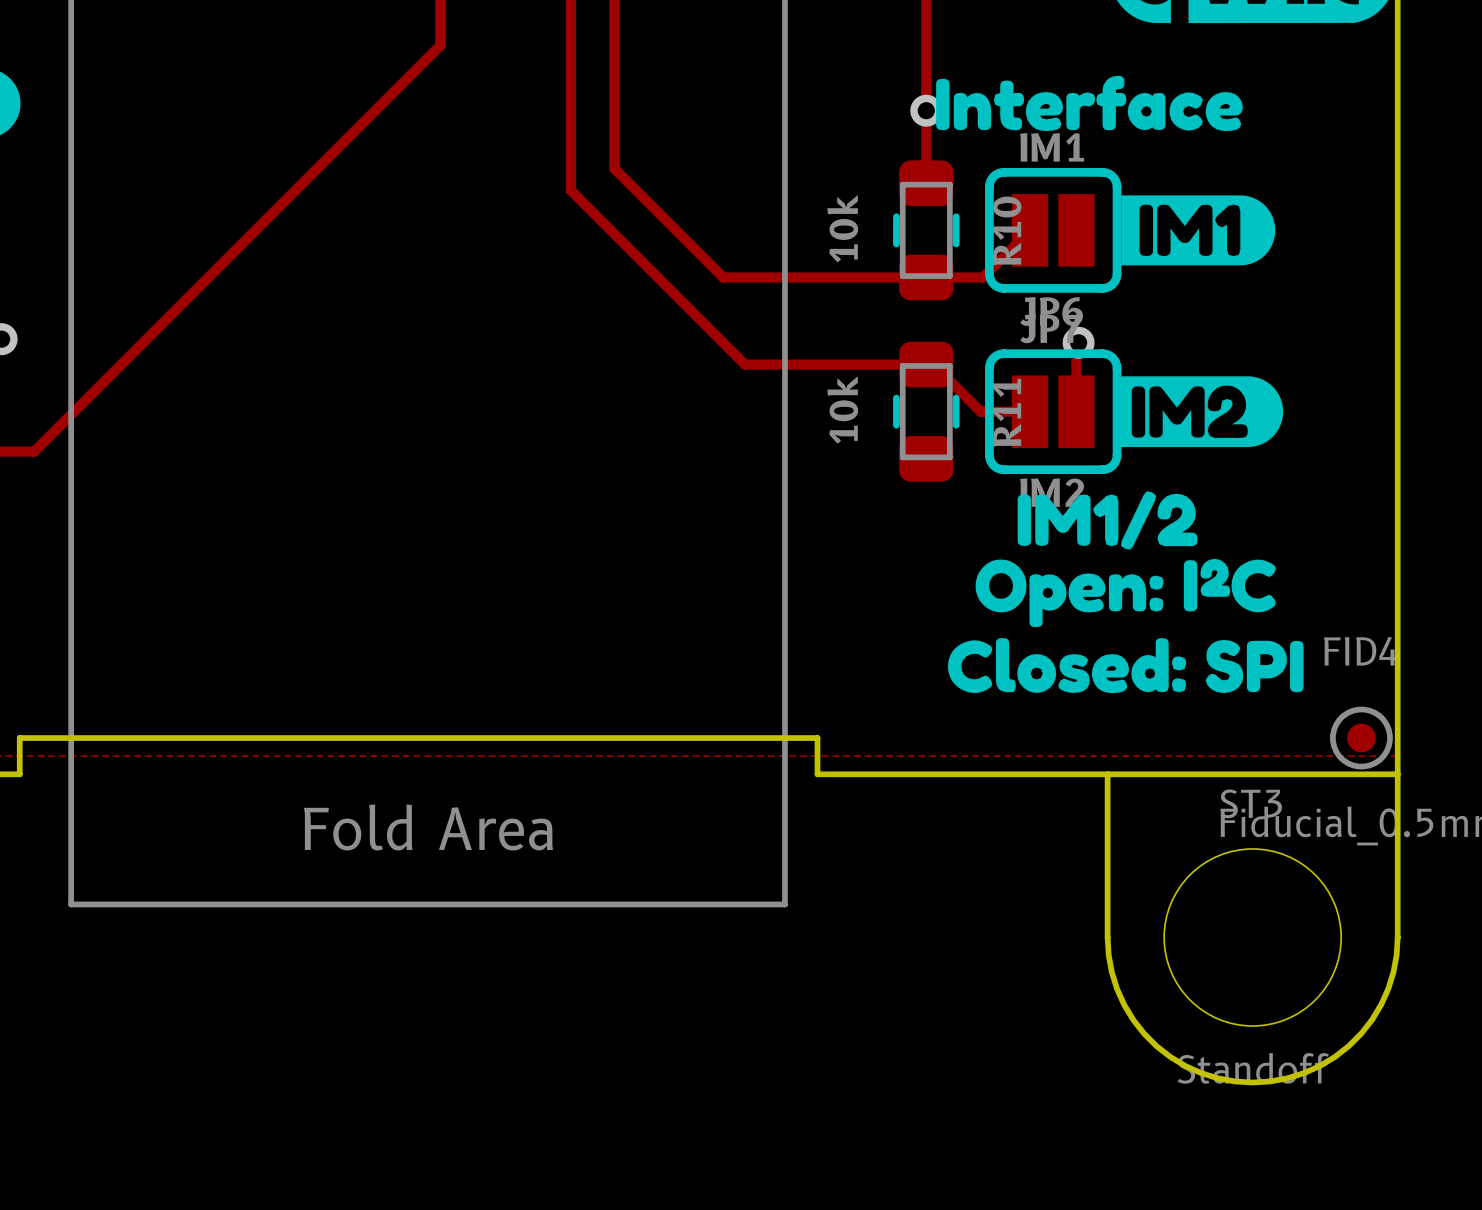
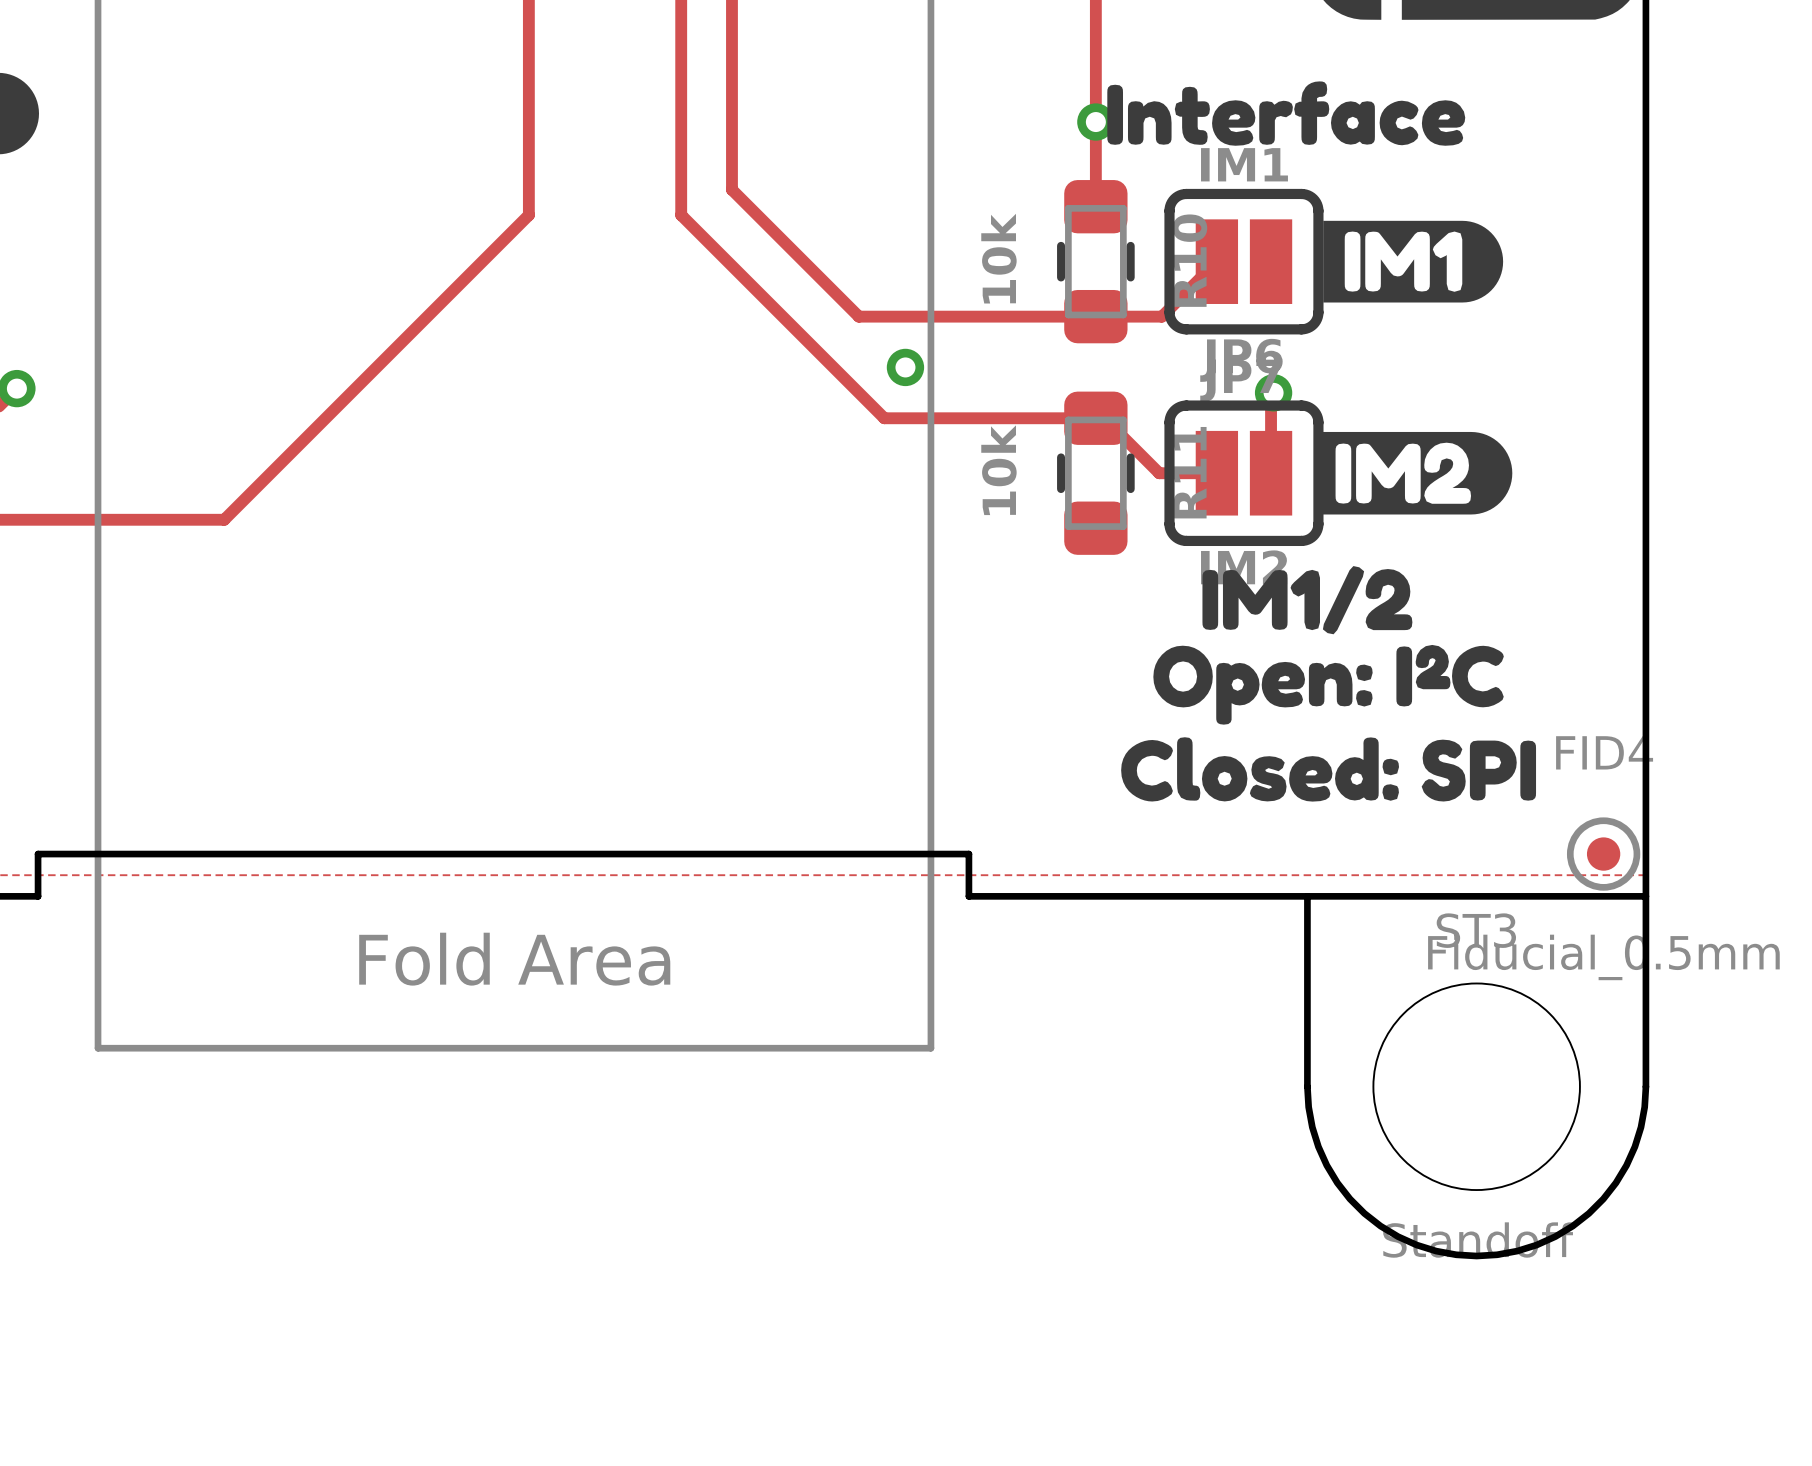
track: (440, 45) (34, 451) -> (528, 45) (528, 215) (224, 519) (54, 519)
via: none -> (905, 367)

